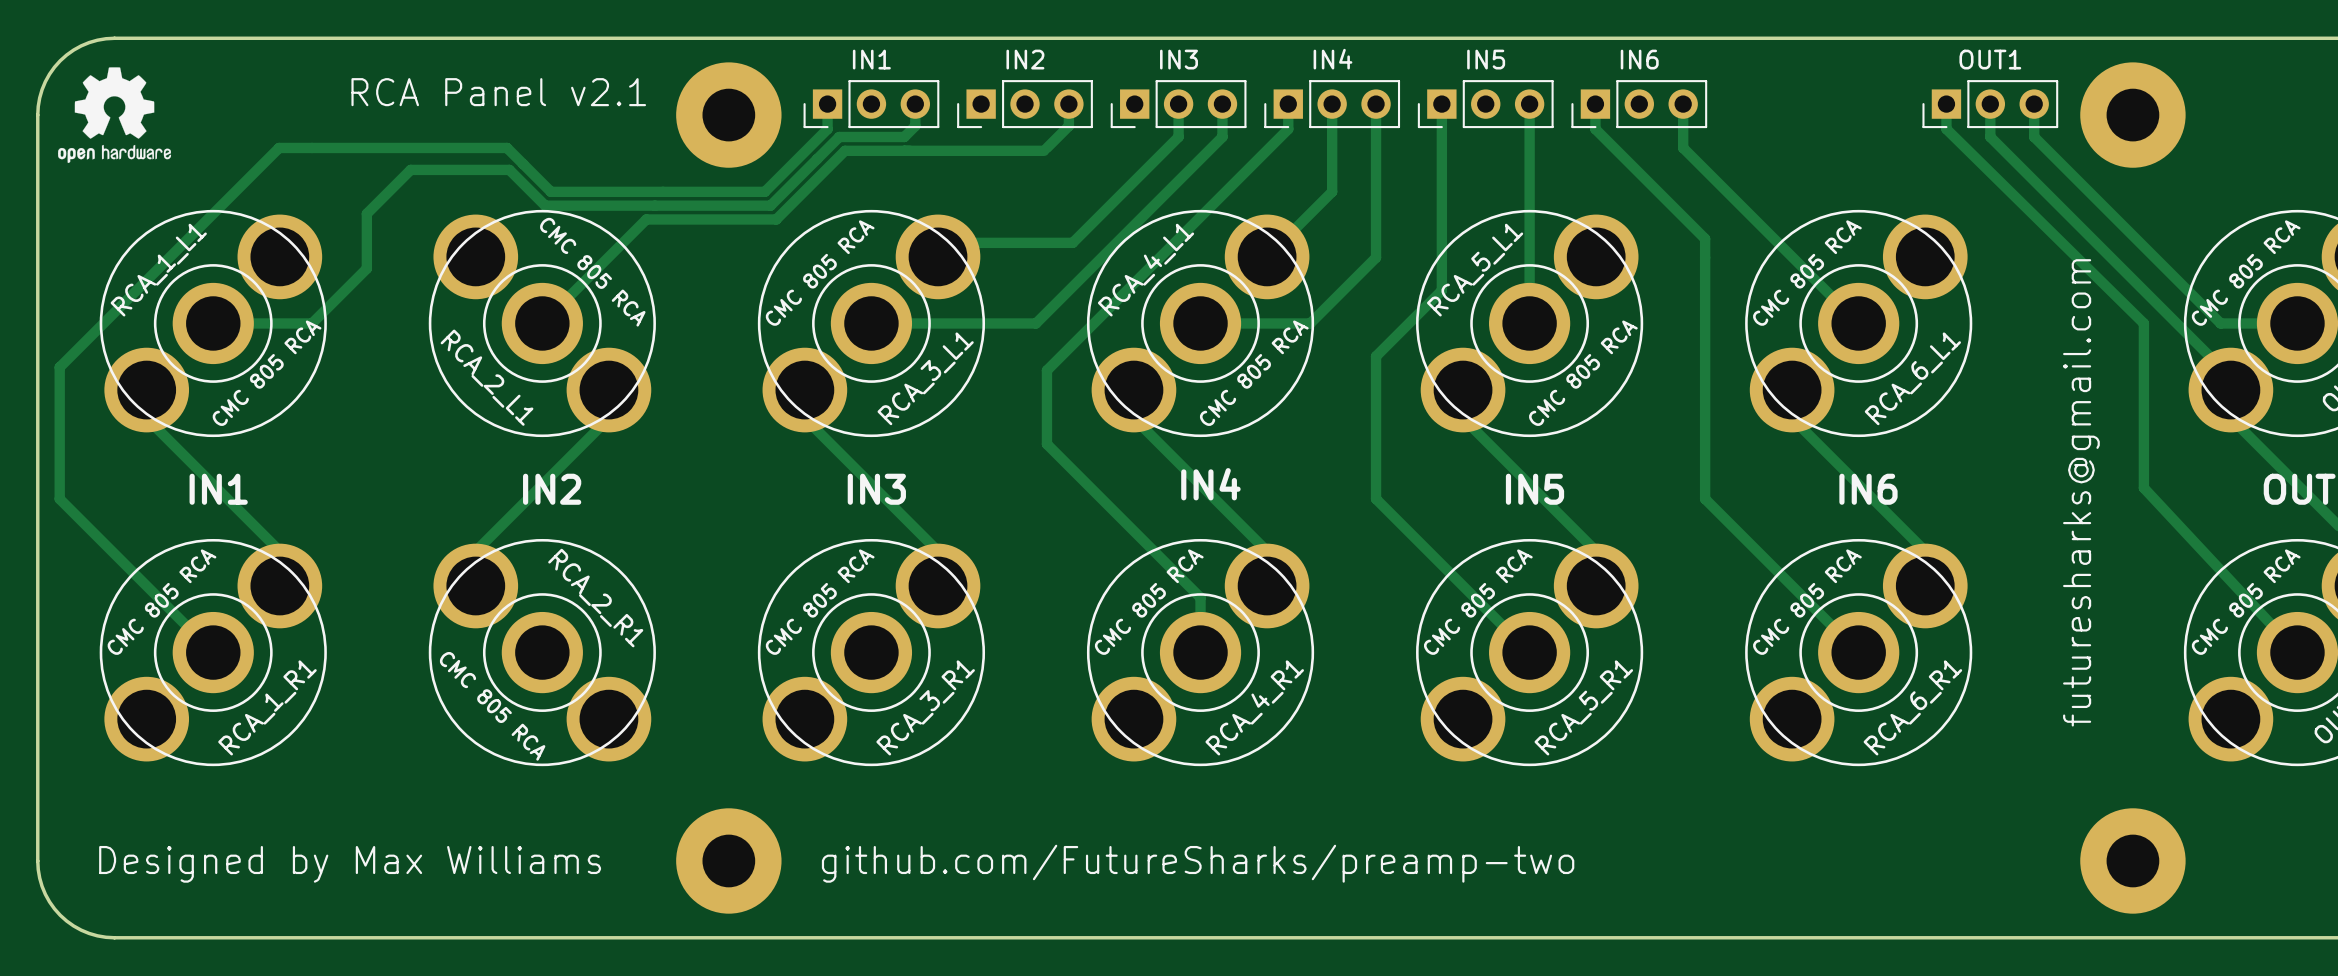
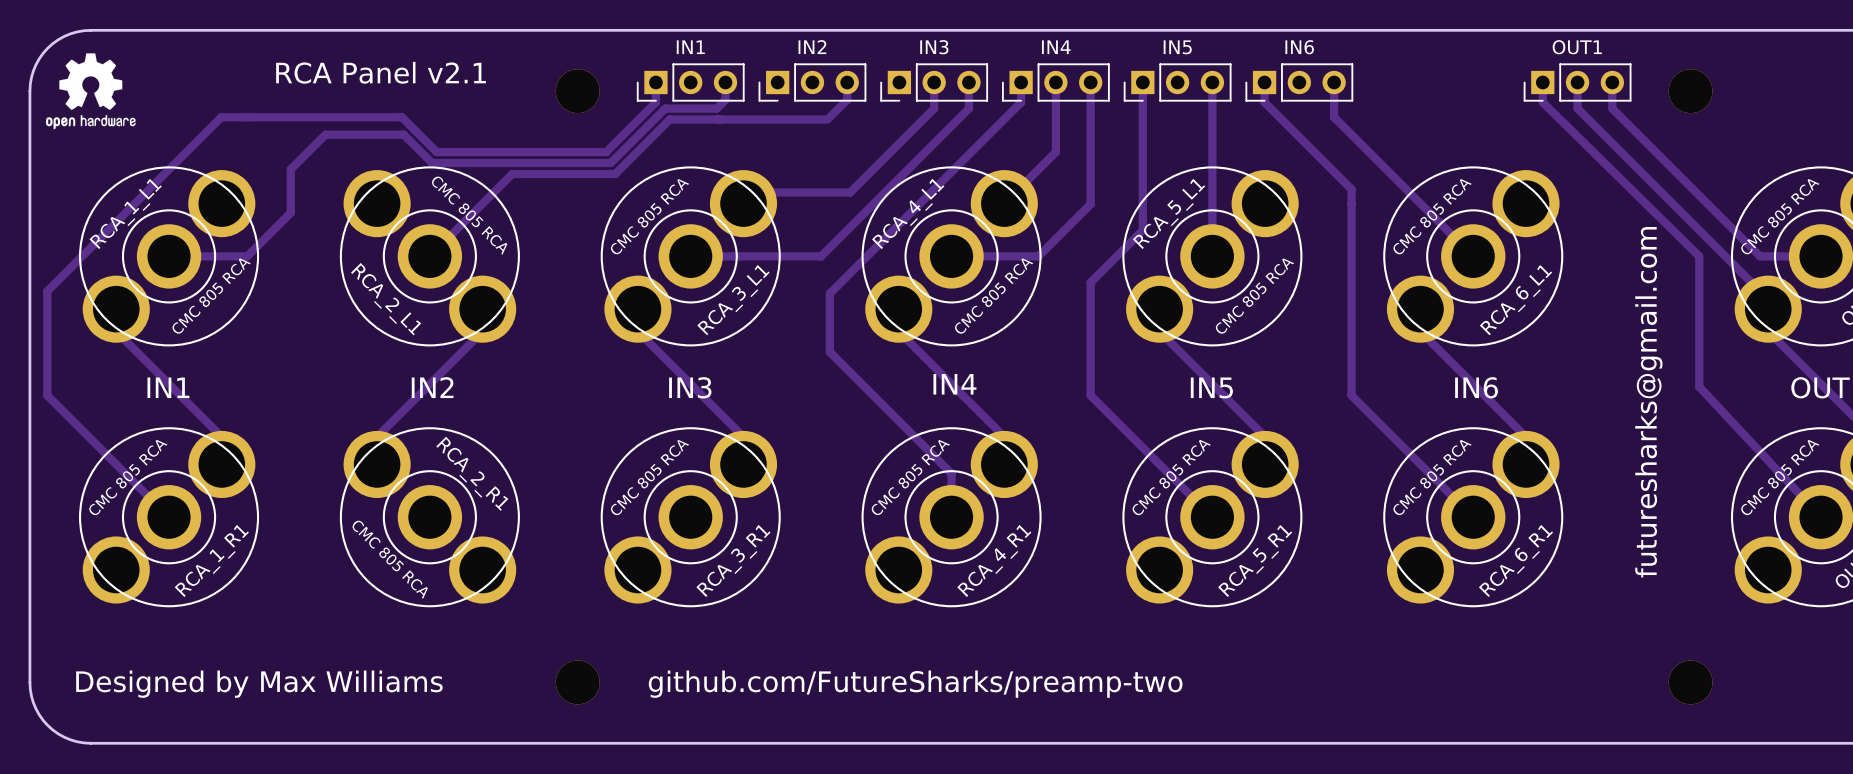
part footprint: [676, 62, 782, 168] -> [555, 69, 600, 114]
part footprint: [2080, 62, 2186, 168] -> [1668, 69, 1713, 114]
part footprint: [676, 808, 782, 914] -> [555, 660, 600, 705]
part footprint: [2080, 808, 2186, 914] -> [1668, 660, 1713, 705]

